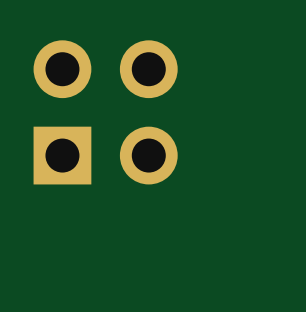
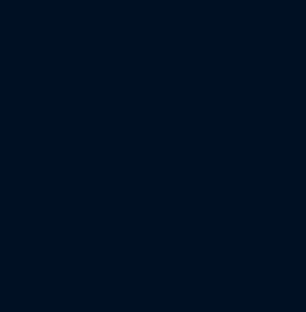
part: (105, 112) -> none

